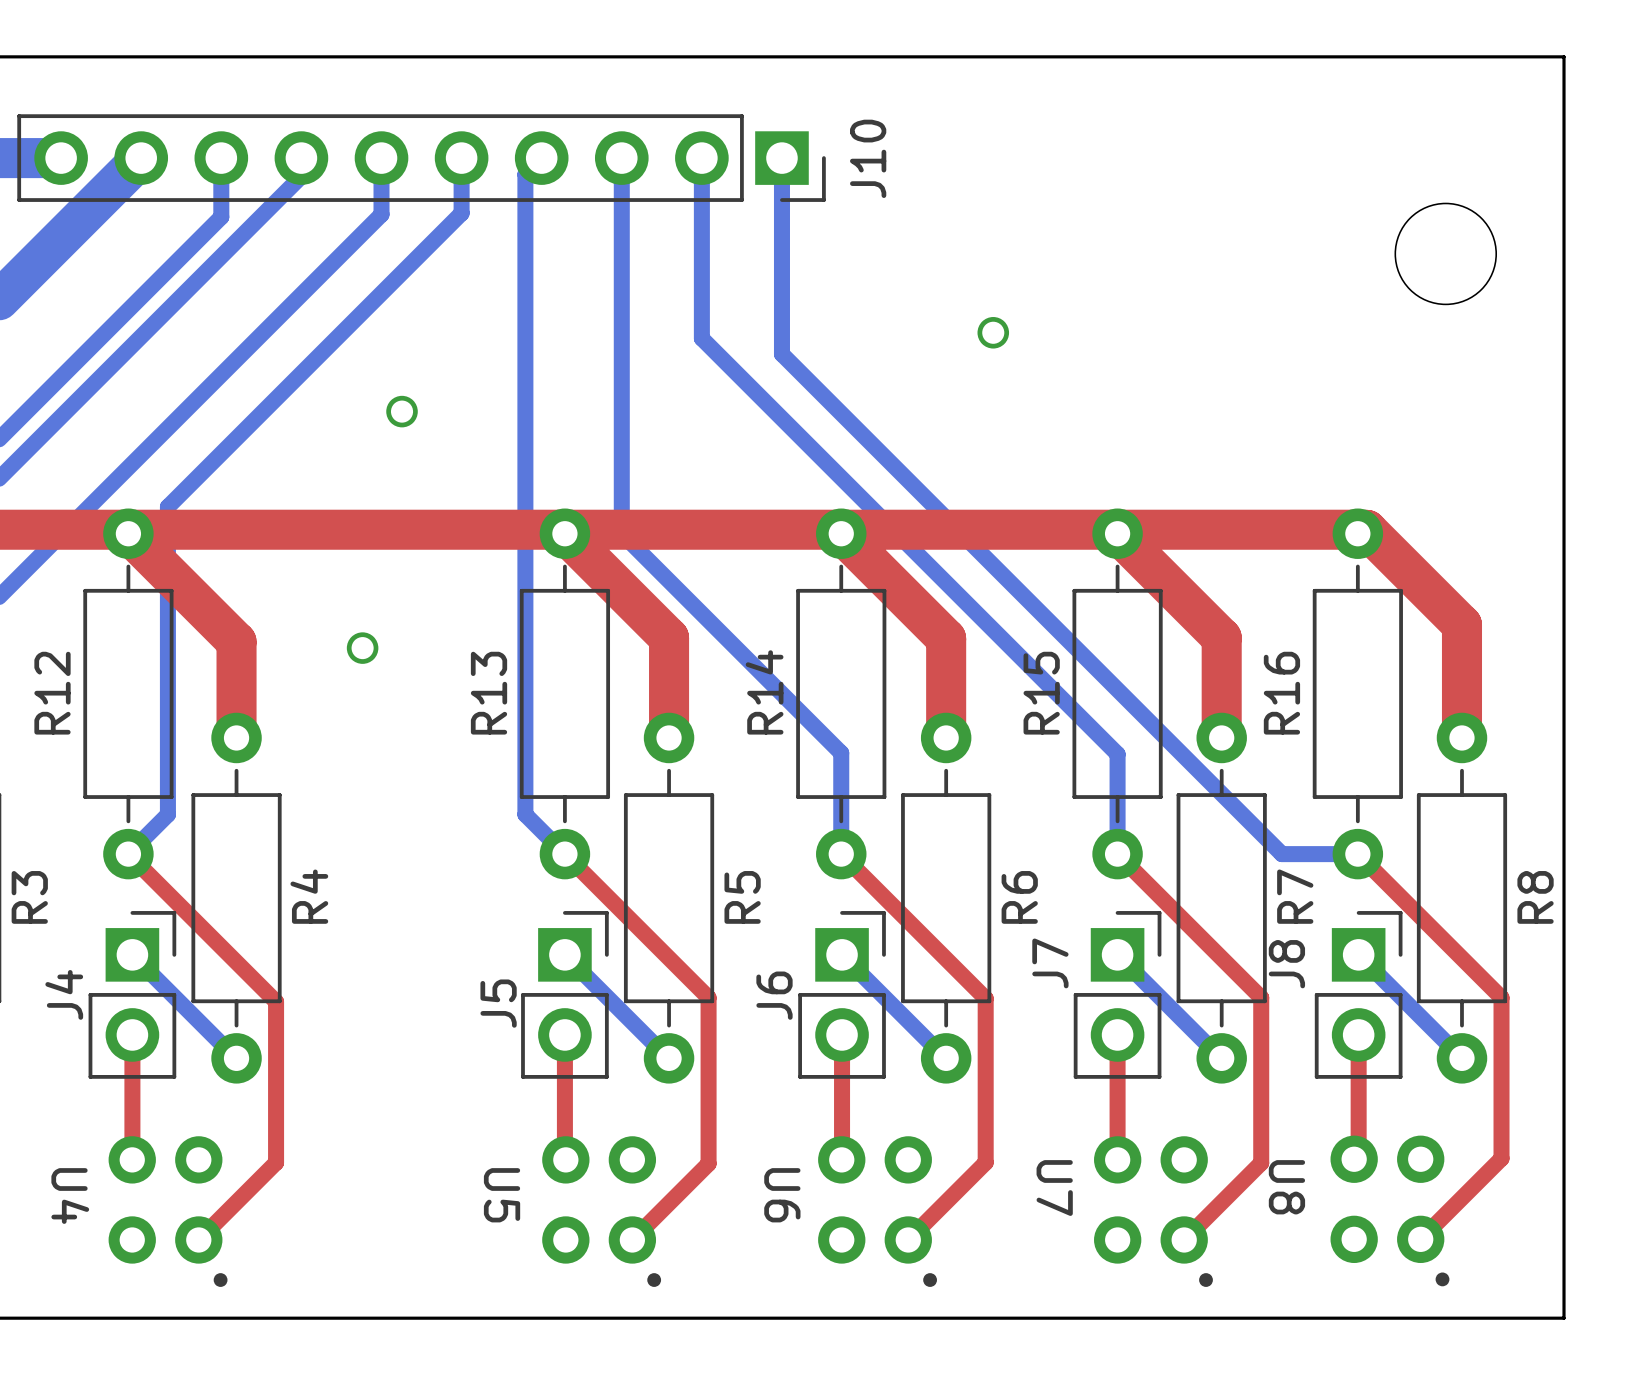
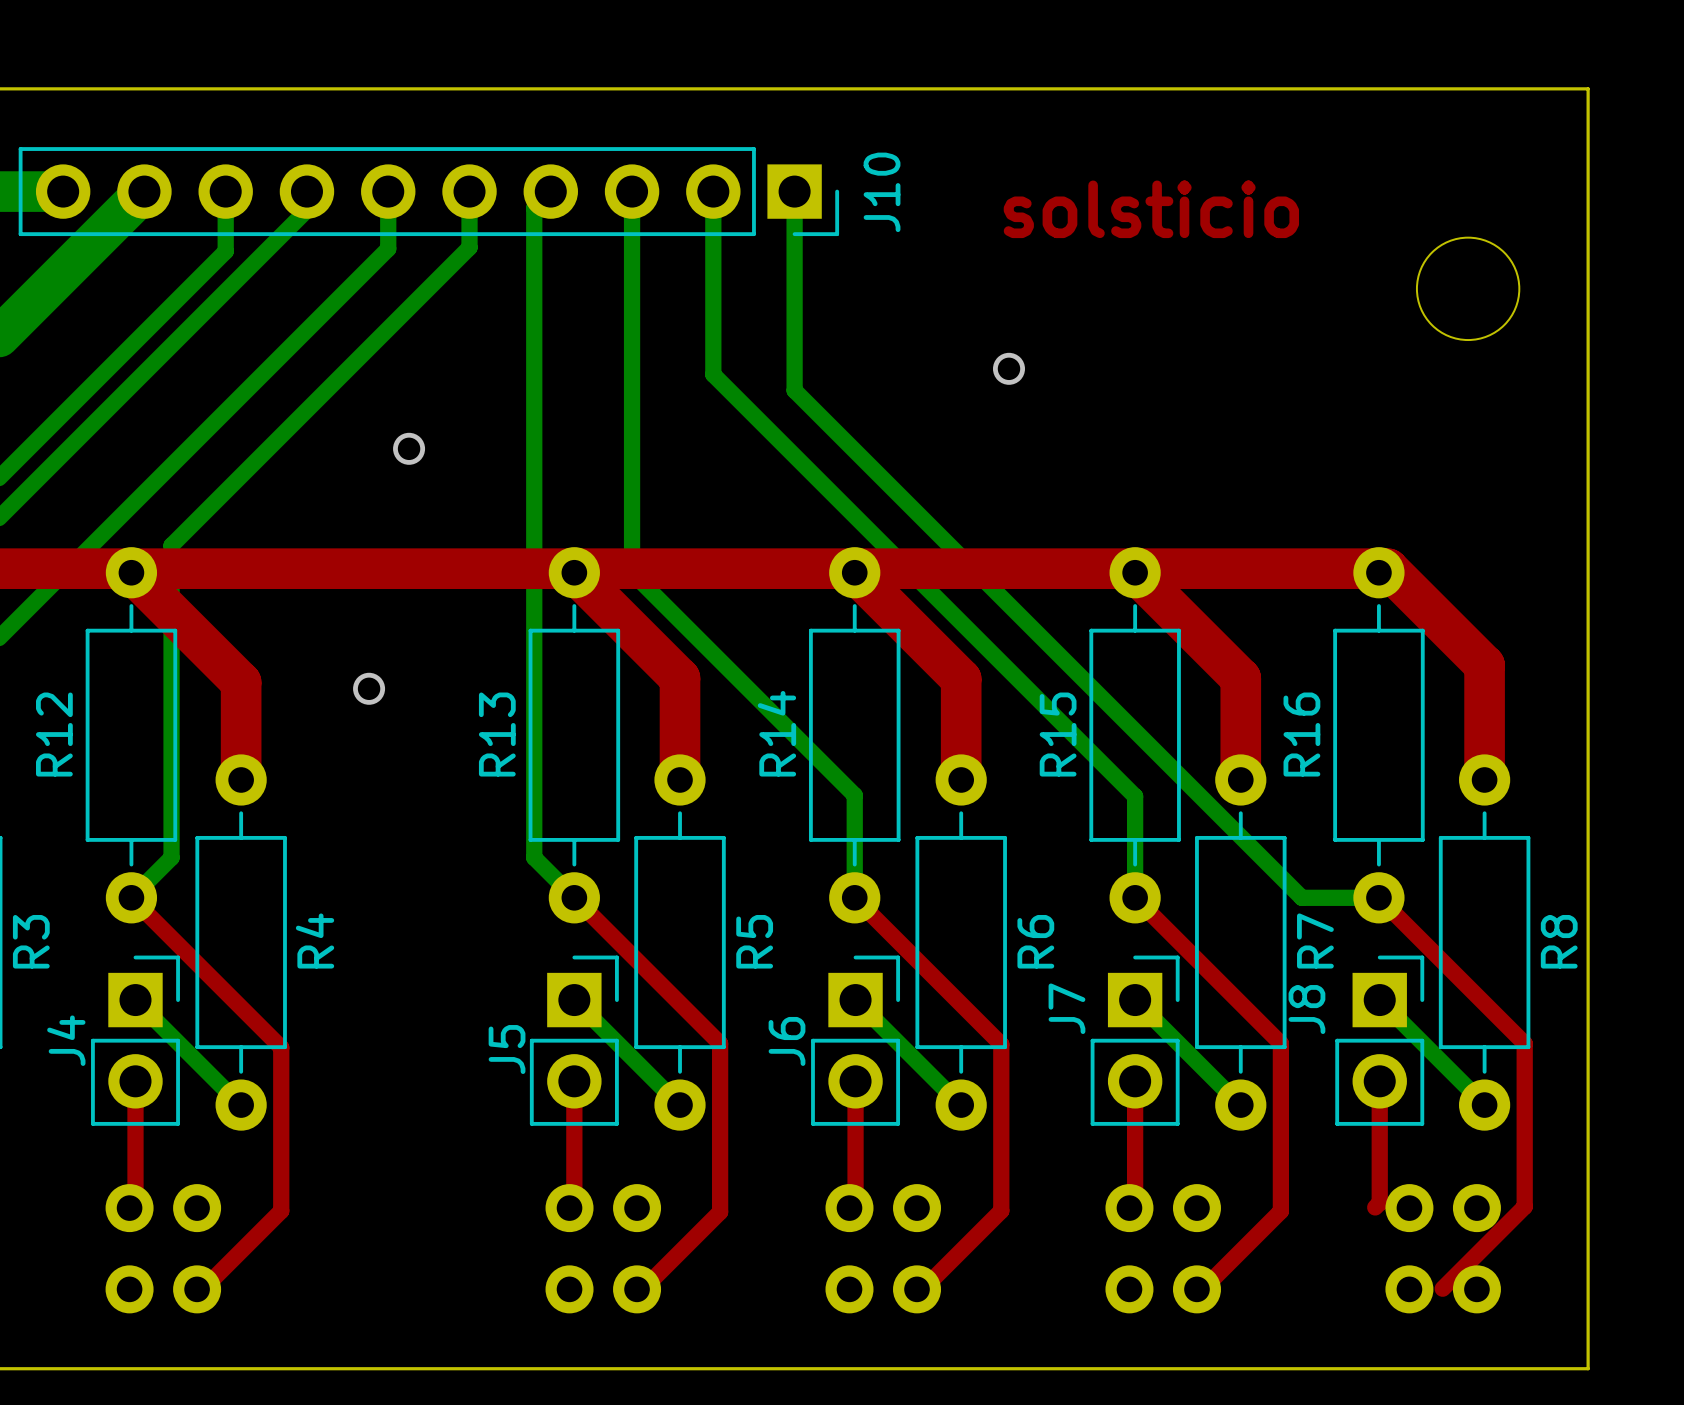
text: none -> solsticio (1151, 209)
part: none -> (883, 1248)
part: none -> (1163, 1248)
part: none -> (1443, 1248)
U8: (1389, 1210) -> none
U4 side: top (168, 1211) -> bottom (603, 1248)
U5 side: top (601, 1211) -> bottom (163, 1248)
U6: (877, 1211) -> none
U7: (1153, 1211) -> none

